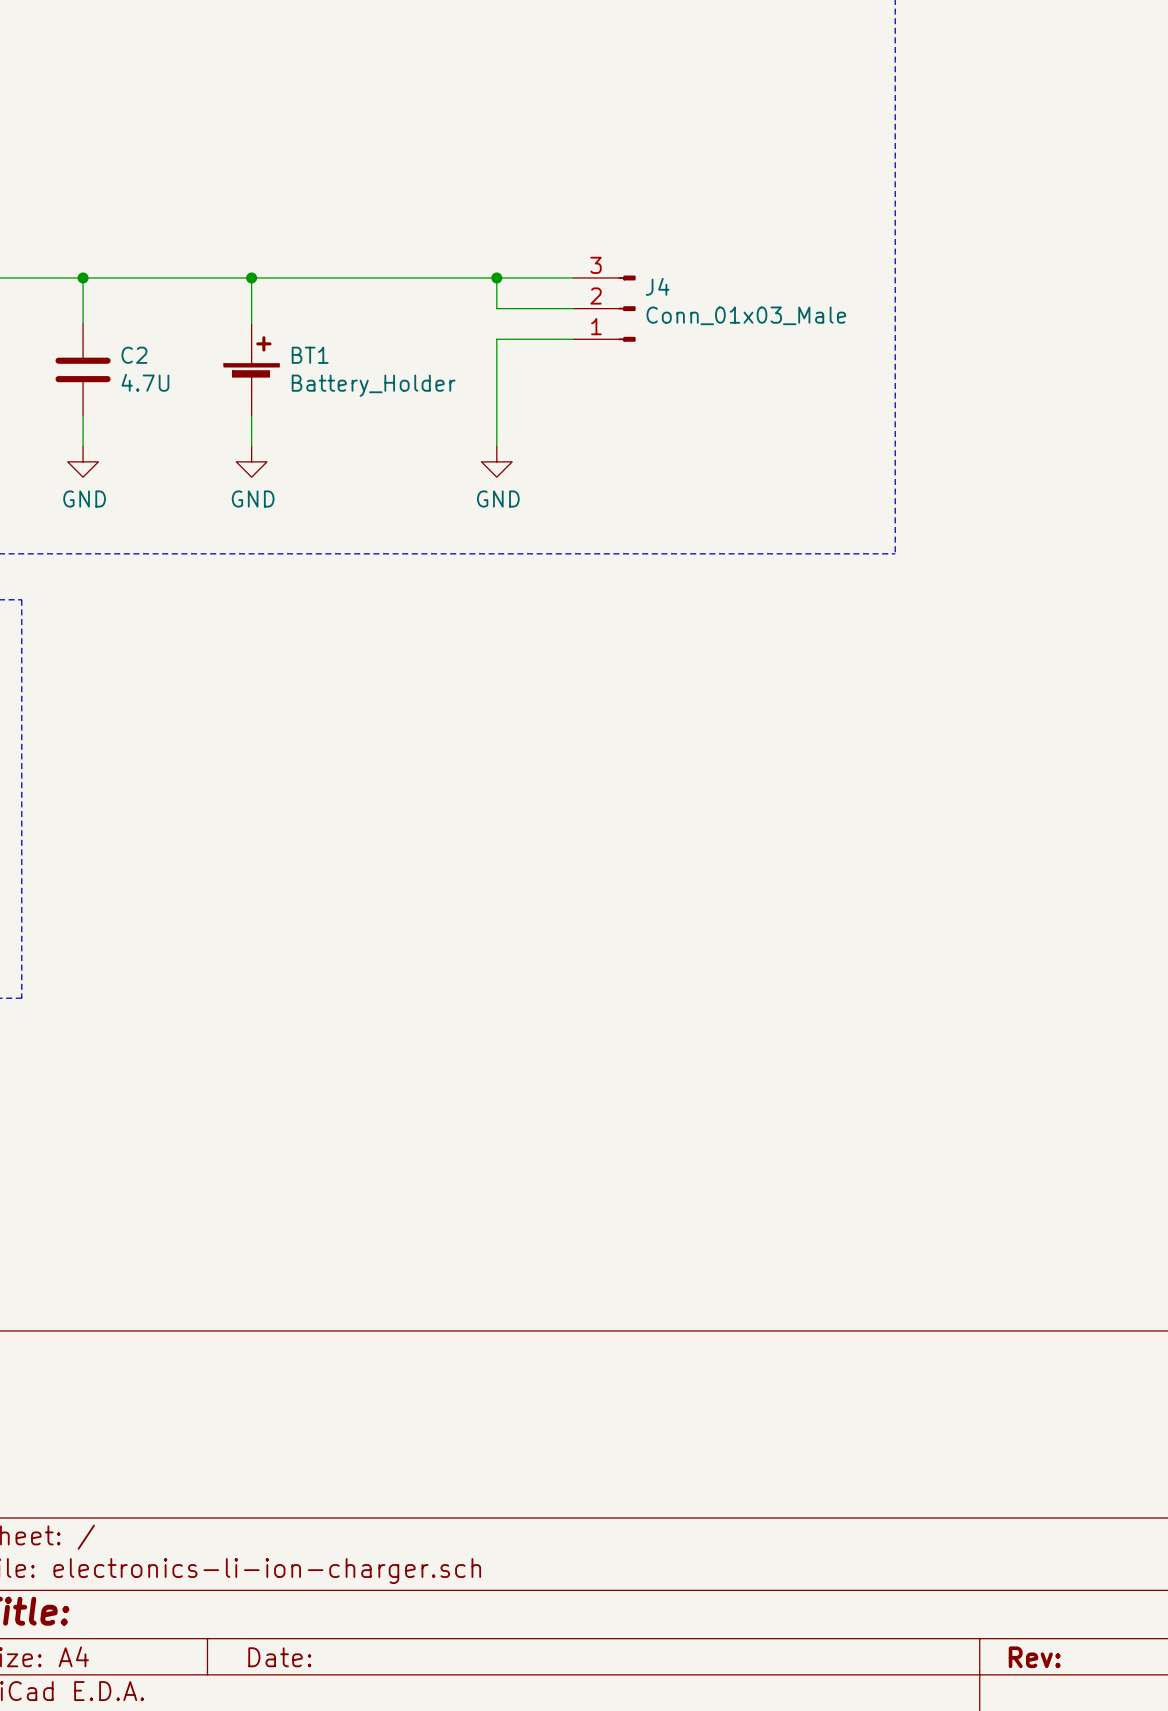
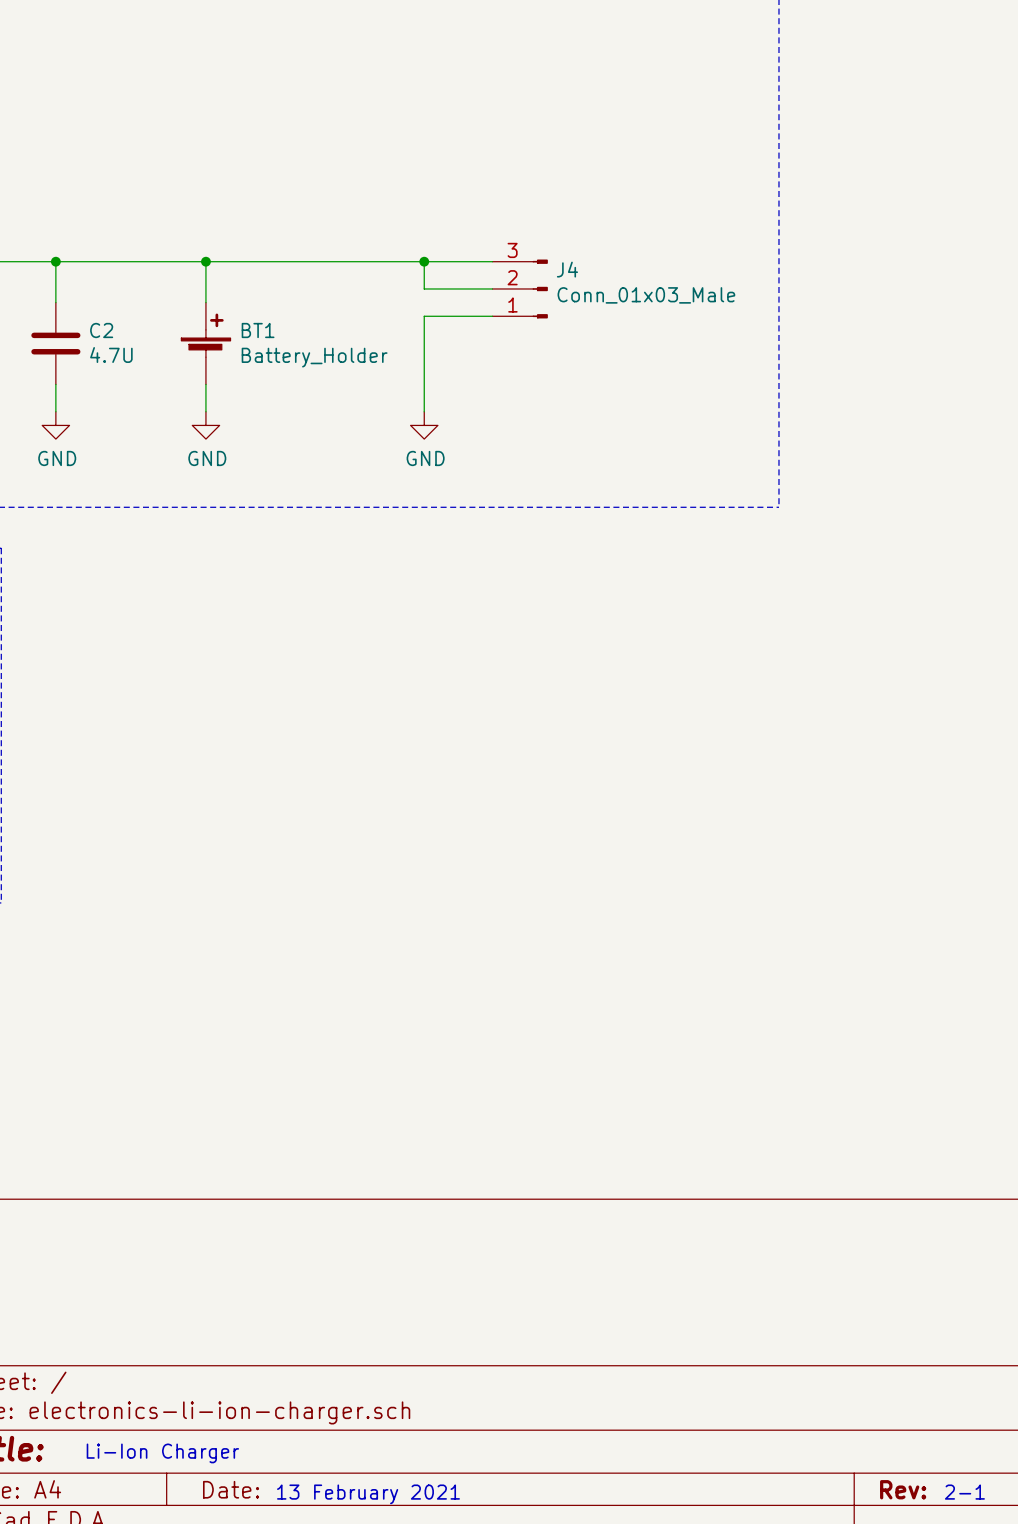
text: none -> Li-Ion Charger (162, 1453)
text: none -> 2-1 (964, 1492)
text: none -> 13 February 2021 (368, 1494)

